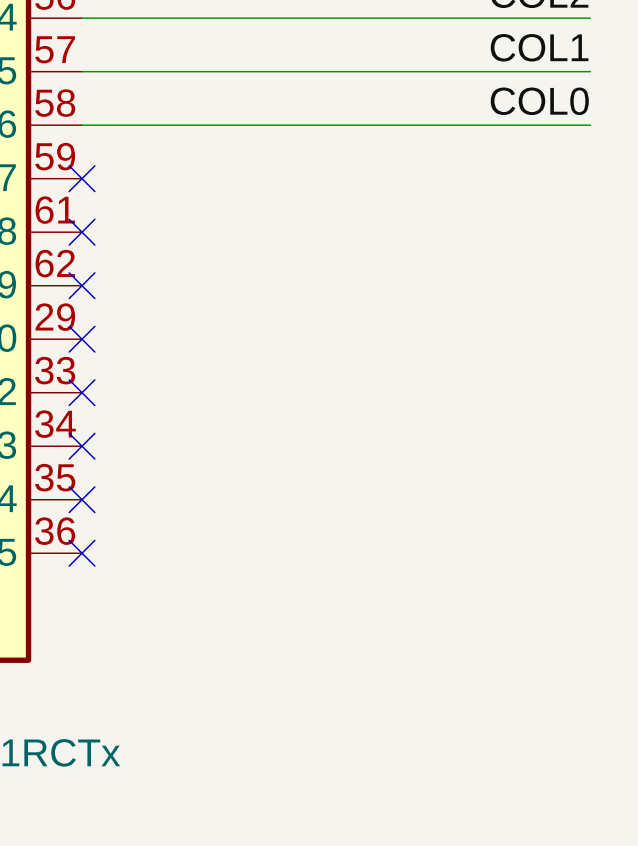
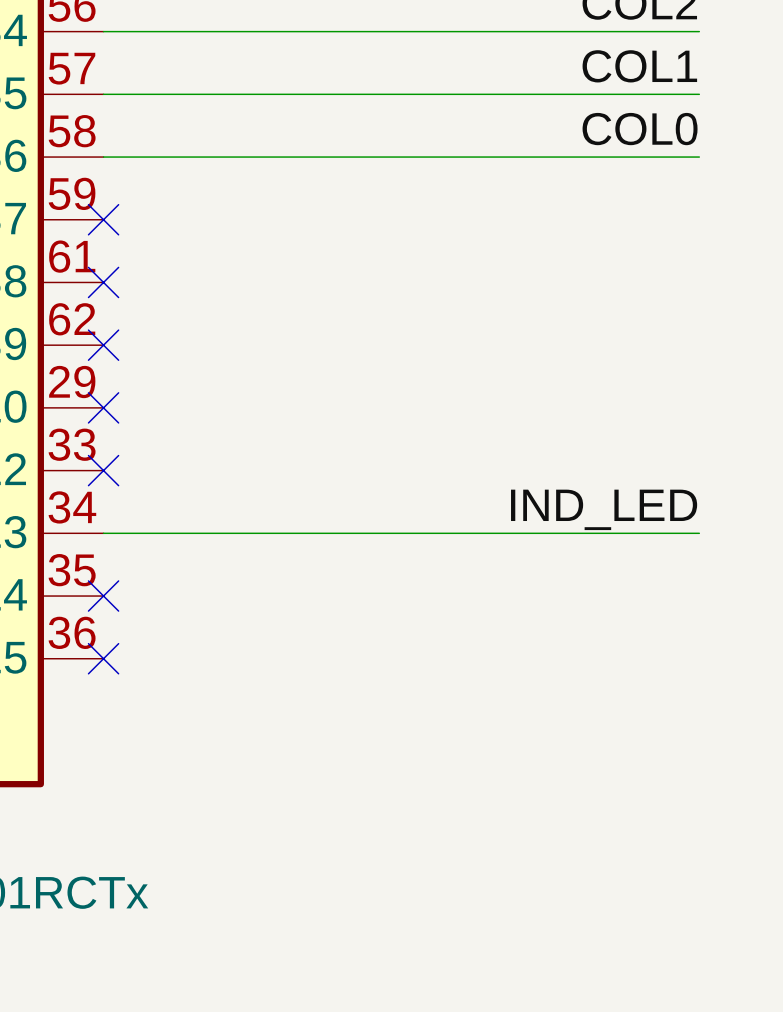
label: none -> IND_LED (604, 509)
wire: none -> (103, 533) (699, 533)
no-connect mark: (82, 446) -> none

